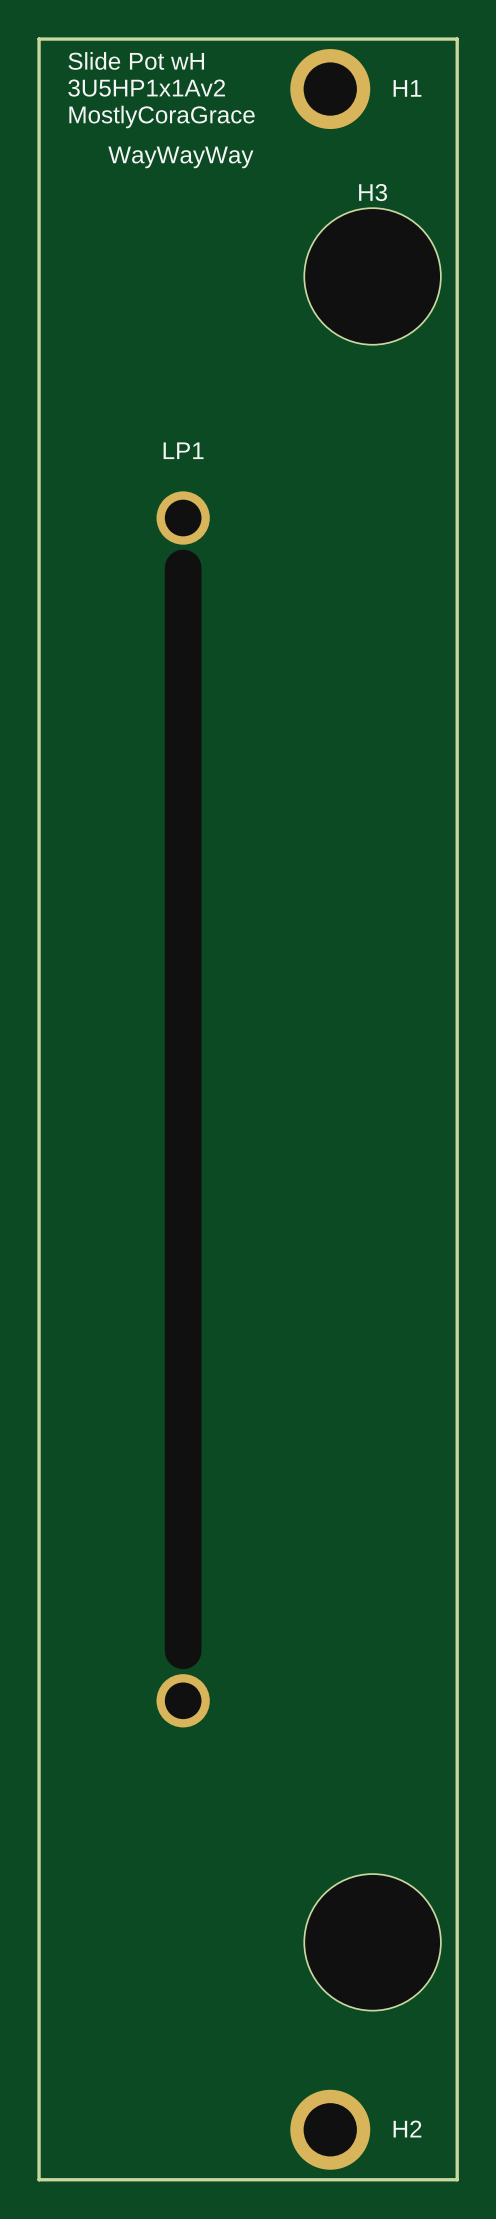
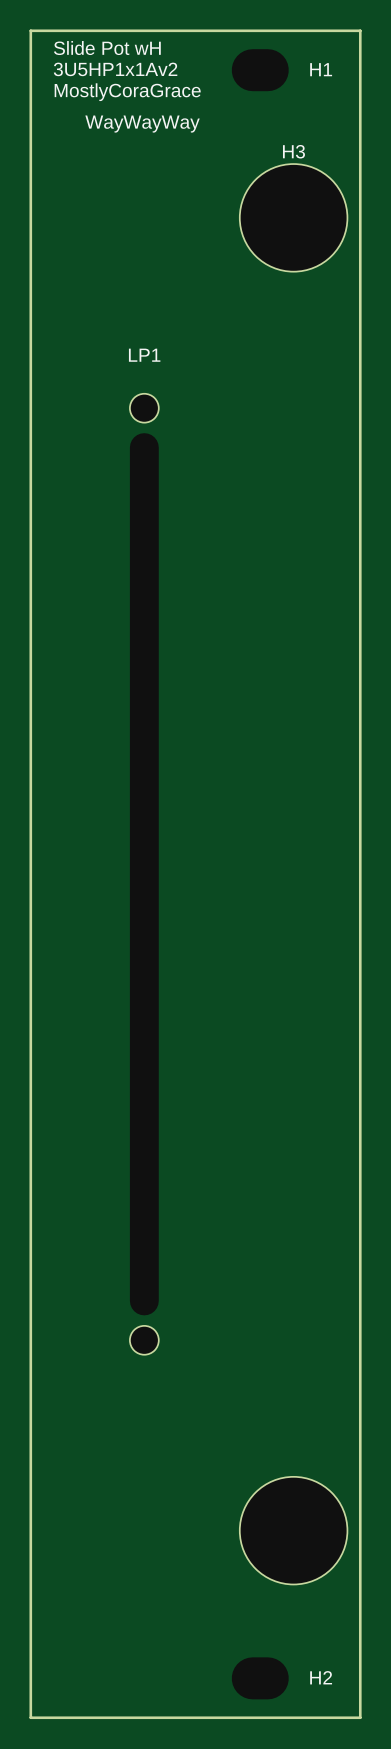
H1 footprint: [290, 49, 371, 130] -> [231, 49, 289, 92]
LP1 footprint: [156, 491, 210, 1728] -> [129, 393, 159, 1355]
H2 footprint: [290, 2089, 371, 2170] -> [231, 1657, 289, 1700]

